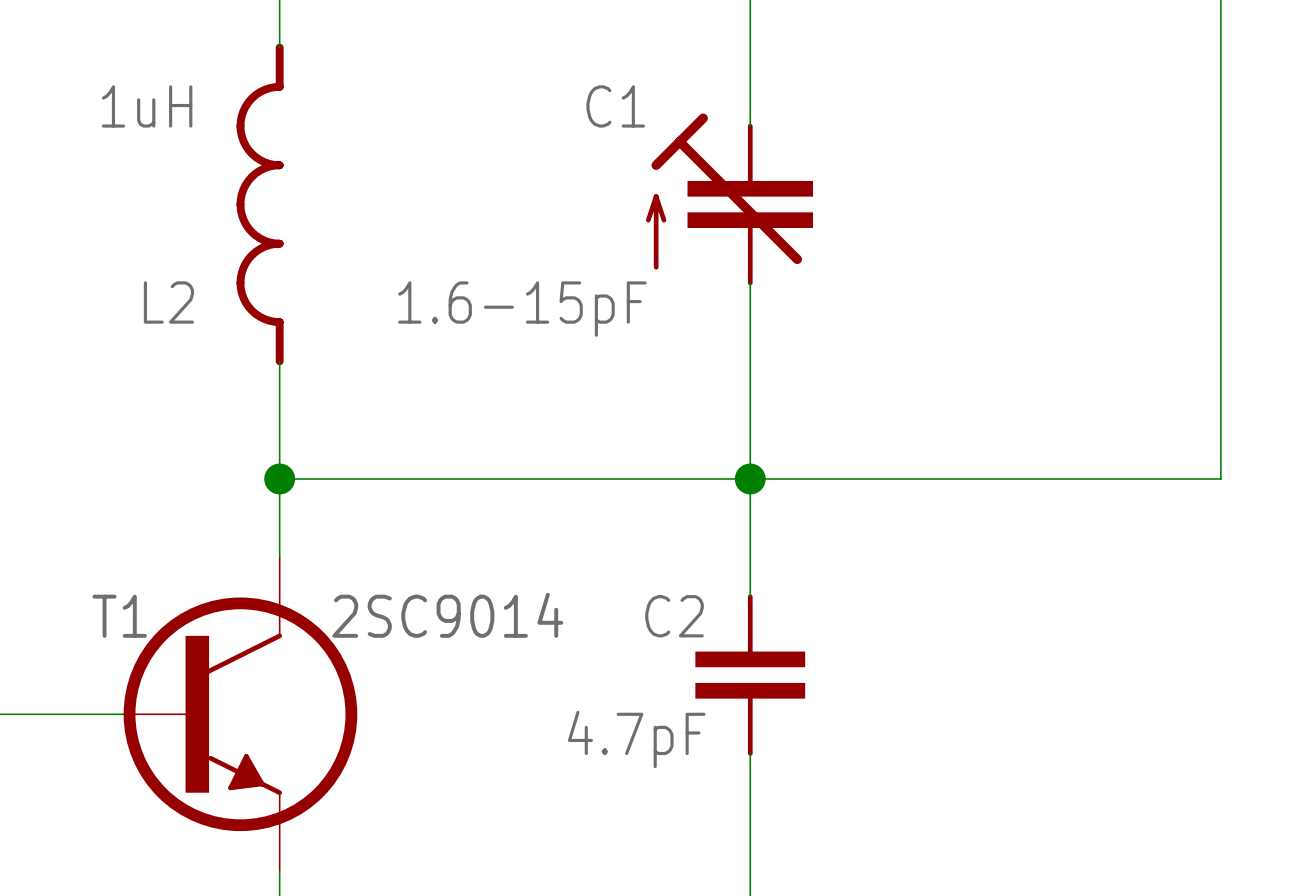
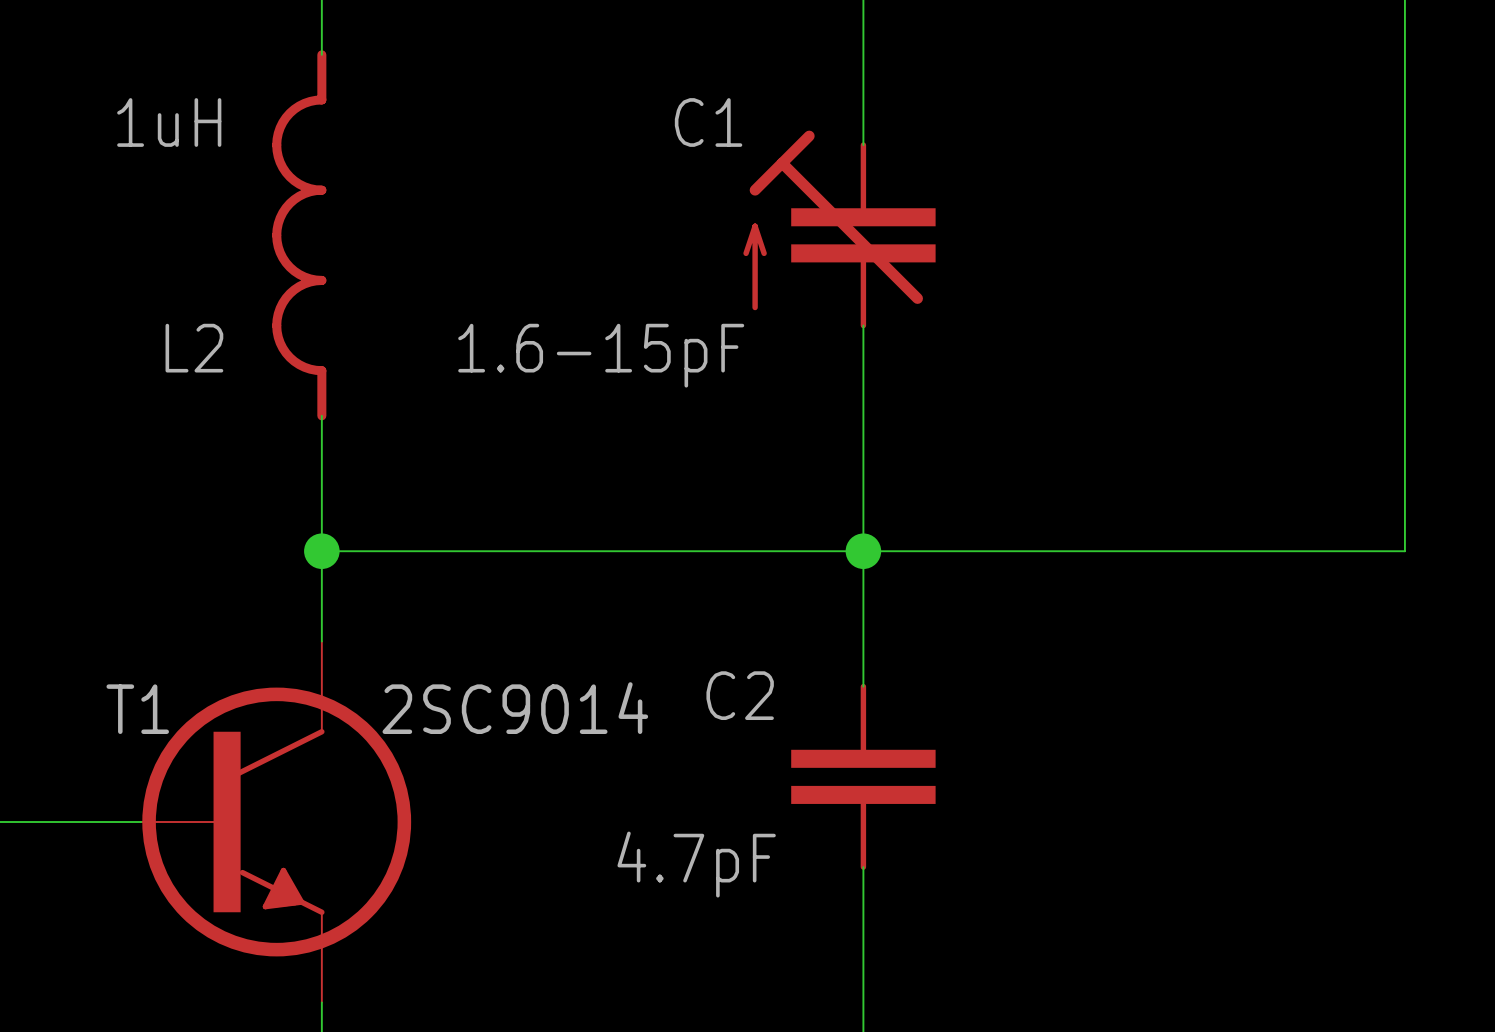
C2 symbol: [695, 594, 806, 756] -> [791, 683, 936, 870]
C2 name position: C2 (674, 616) -> C2 (740, 695)
C2 value position: 4.7pF (636, 739) -> 4.7pF (696, 864)

